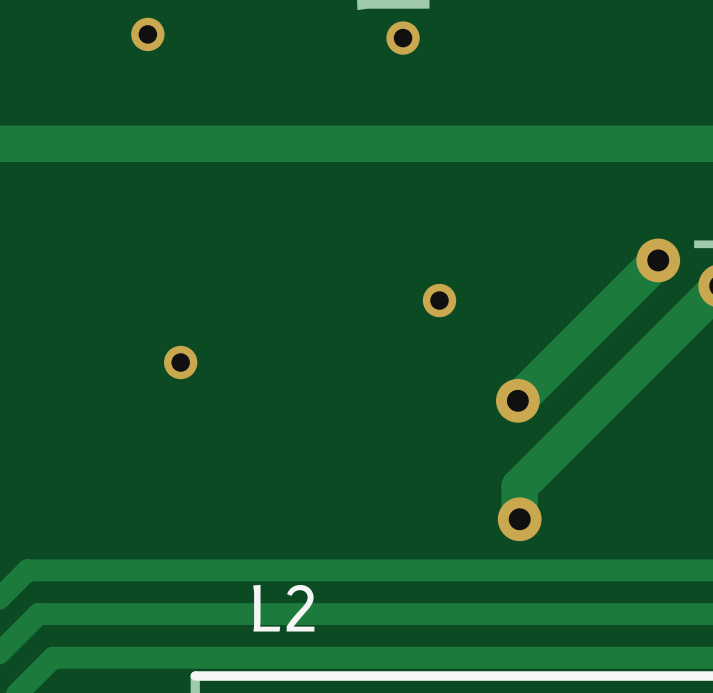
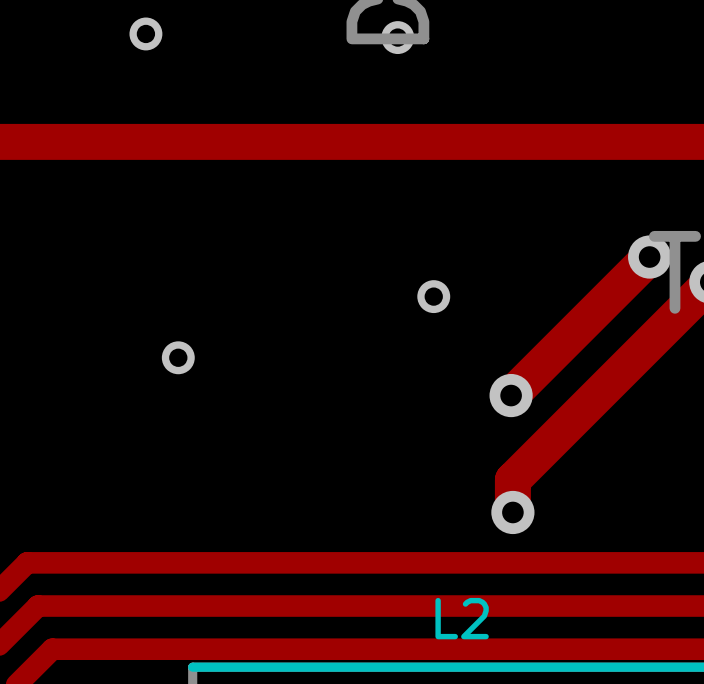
L2 name position: L2 (283, 608) -> L2 (462, 618)

